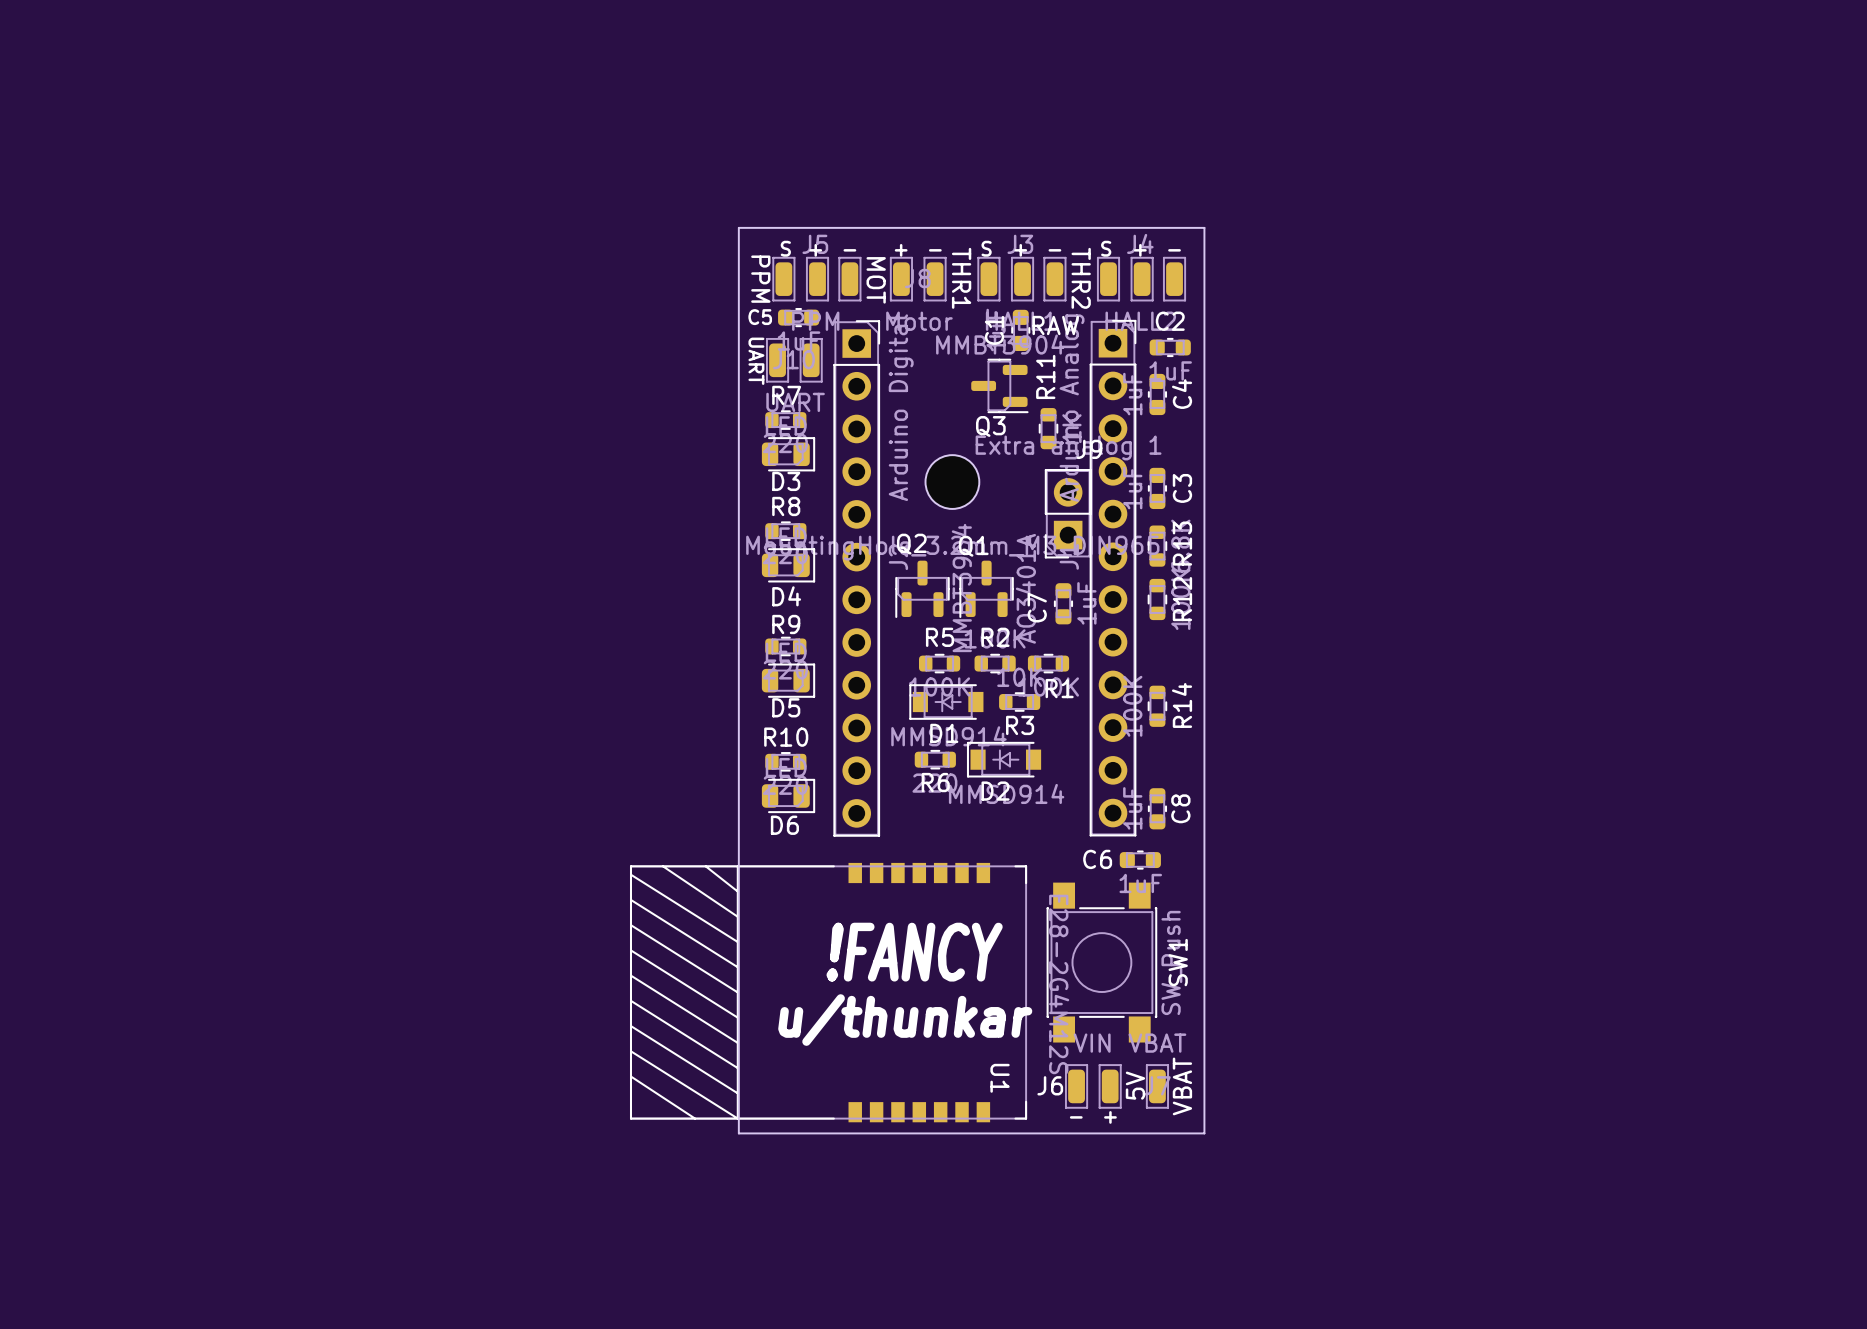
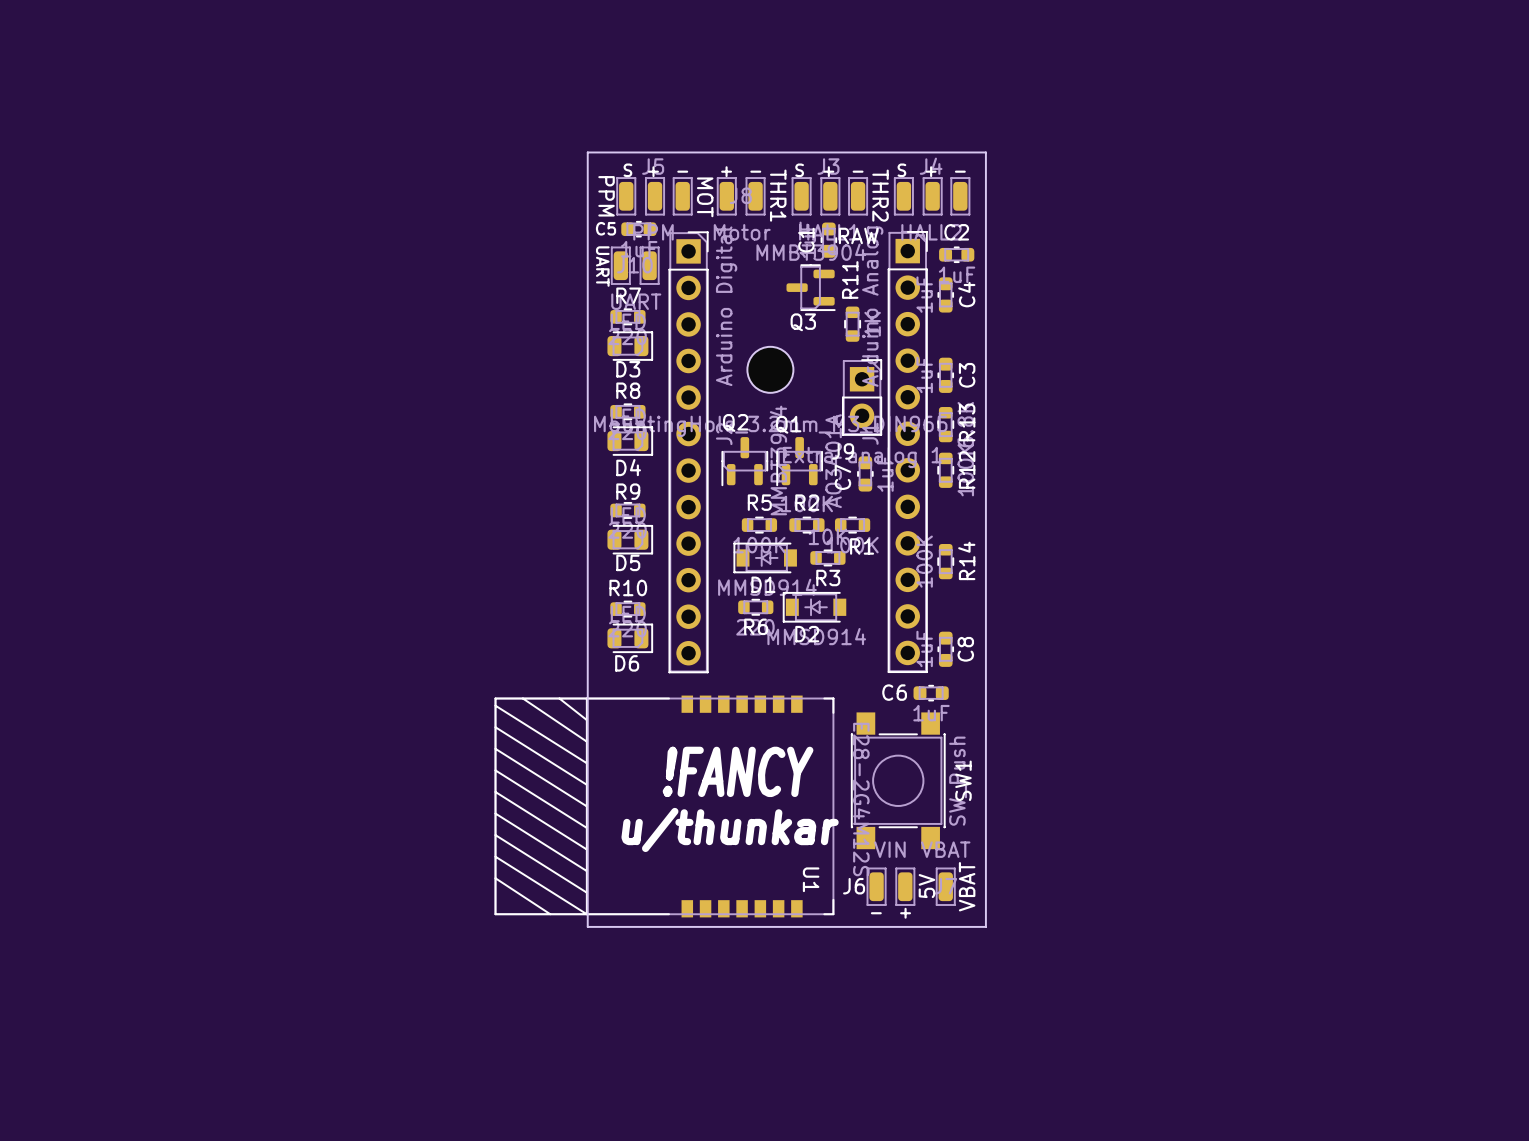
J9 rotation: 0° (1068, 513) -> 180° (862, 397)

